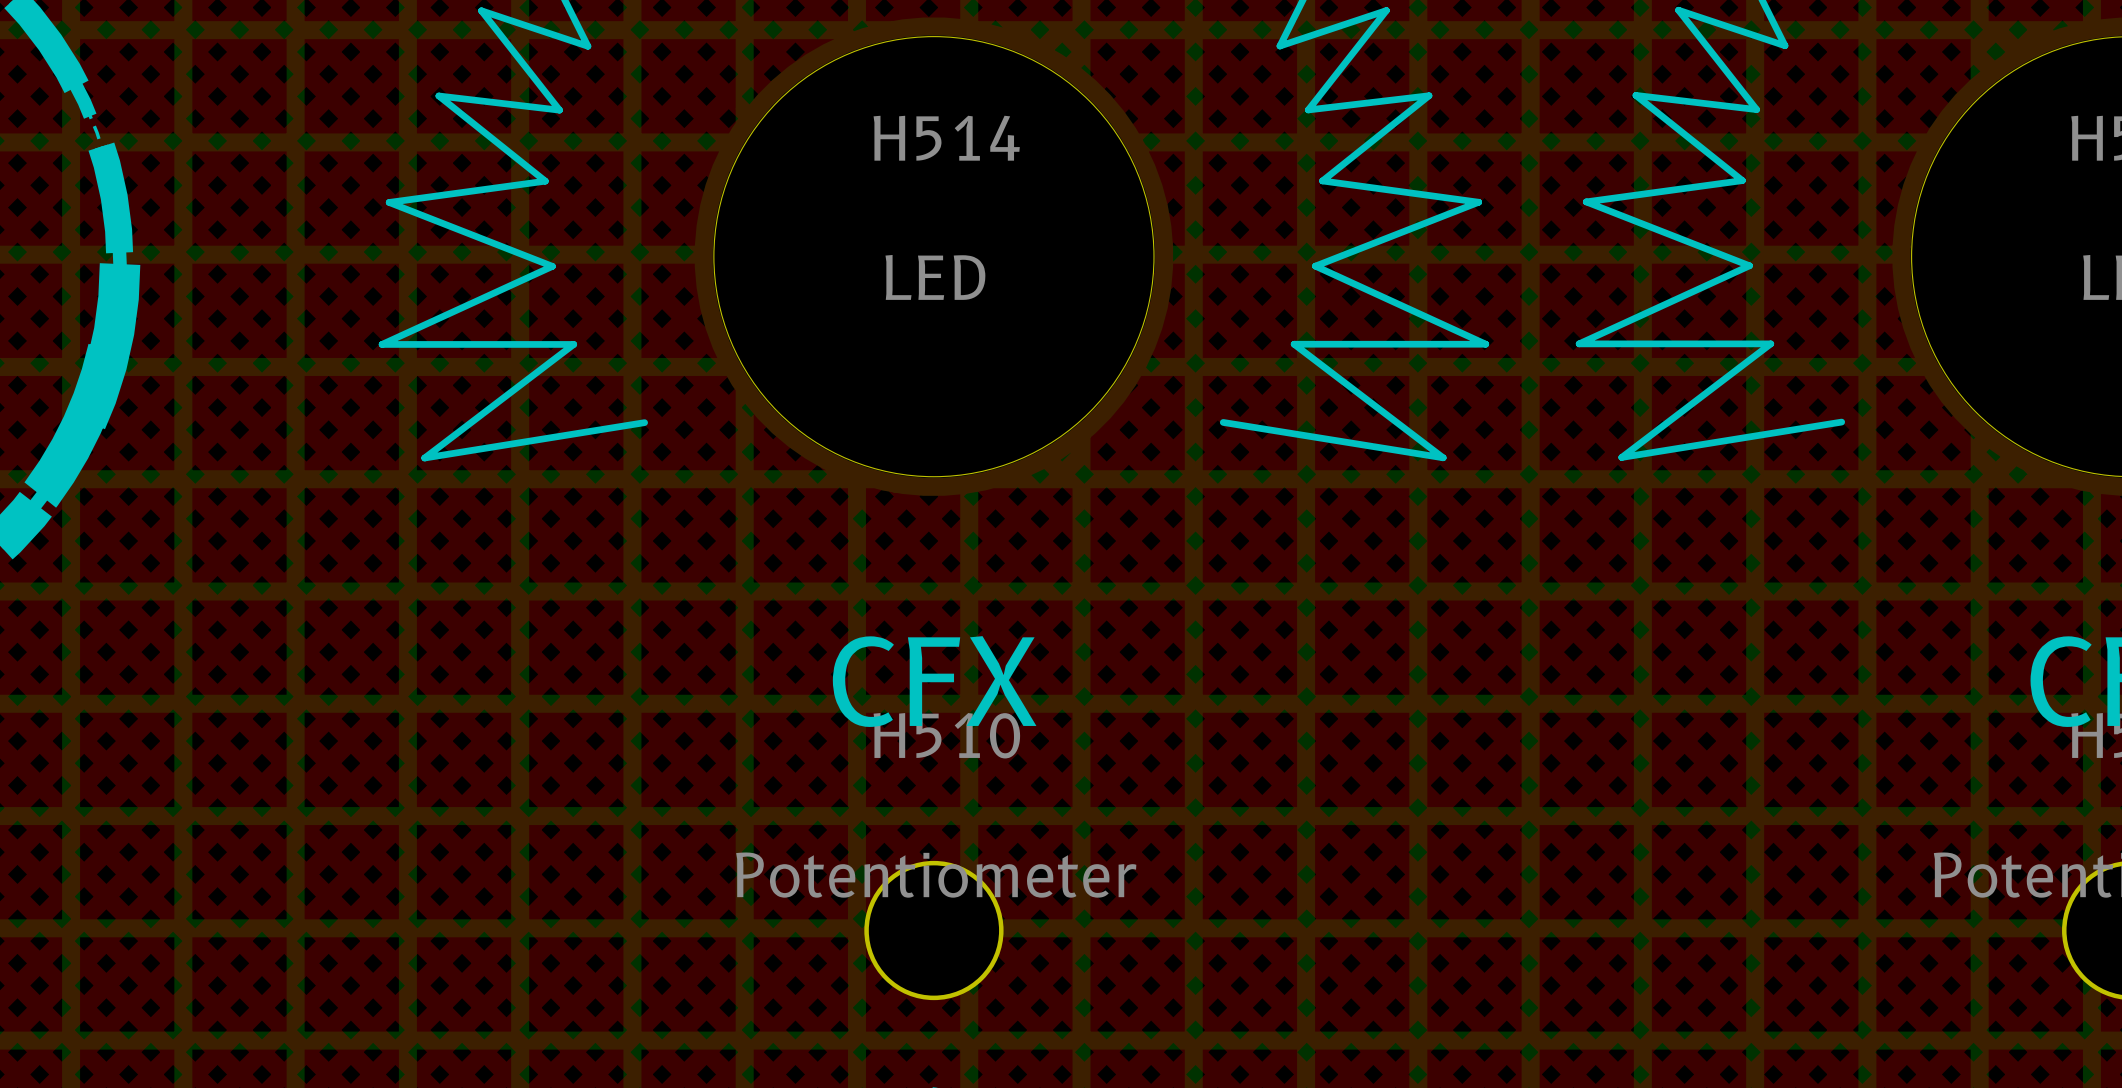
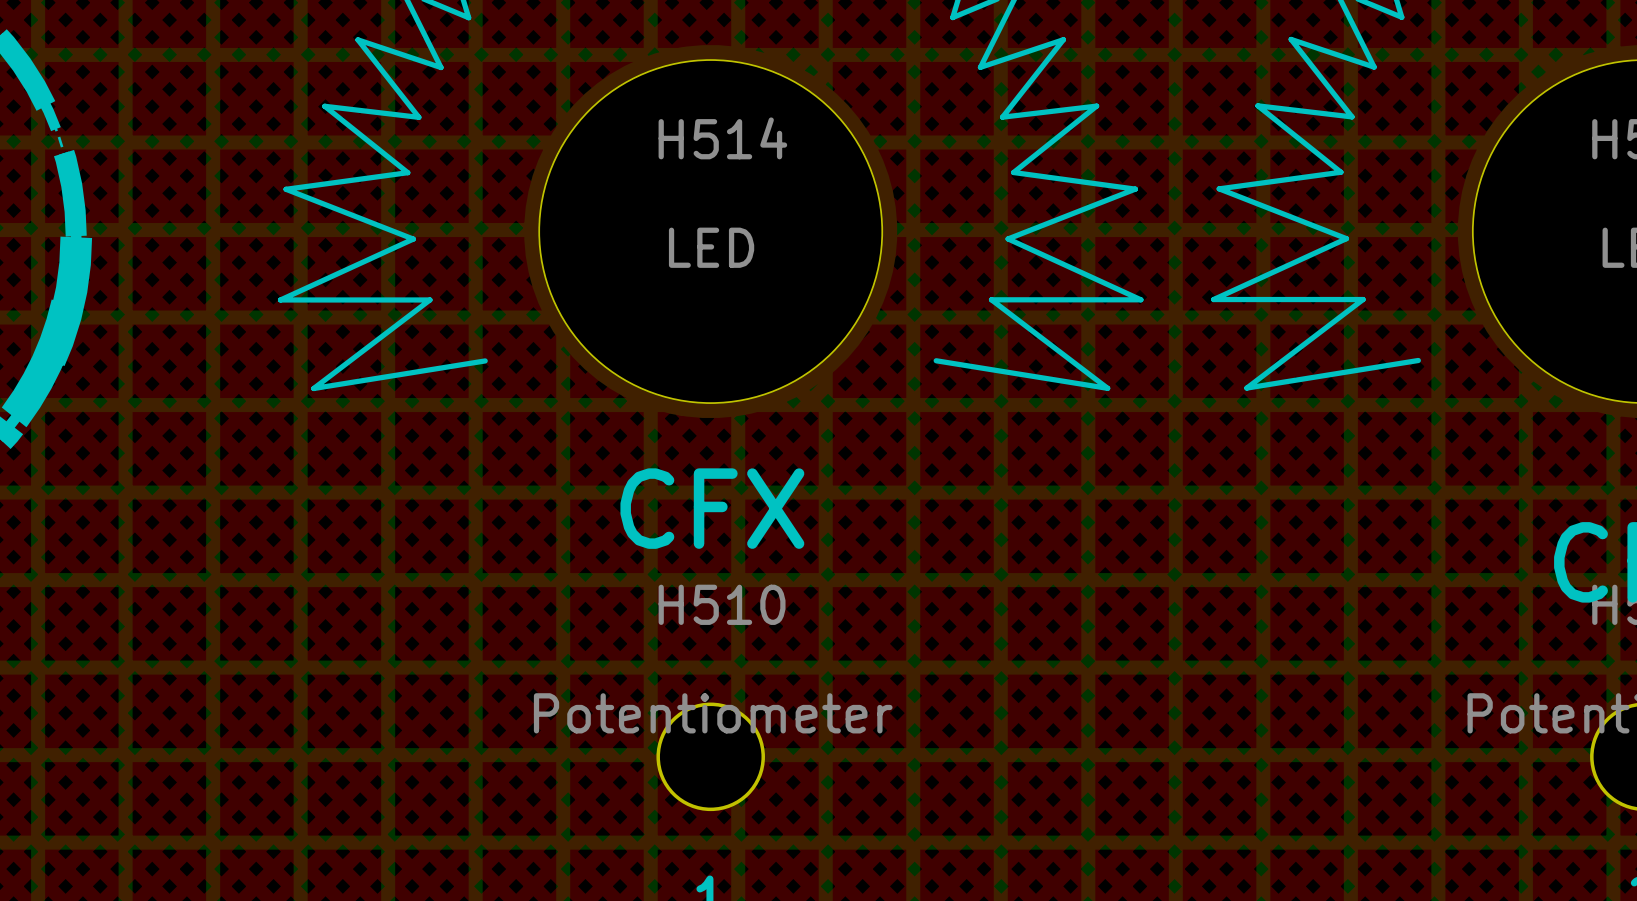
text position: CFX (934, 681) -> CFX (712, 508)

